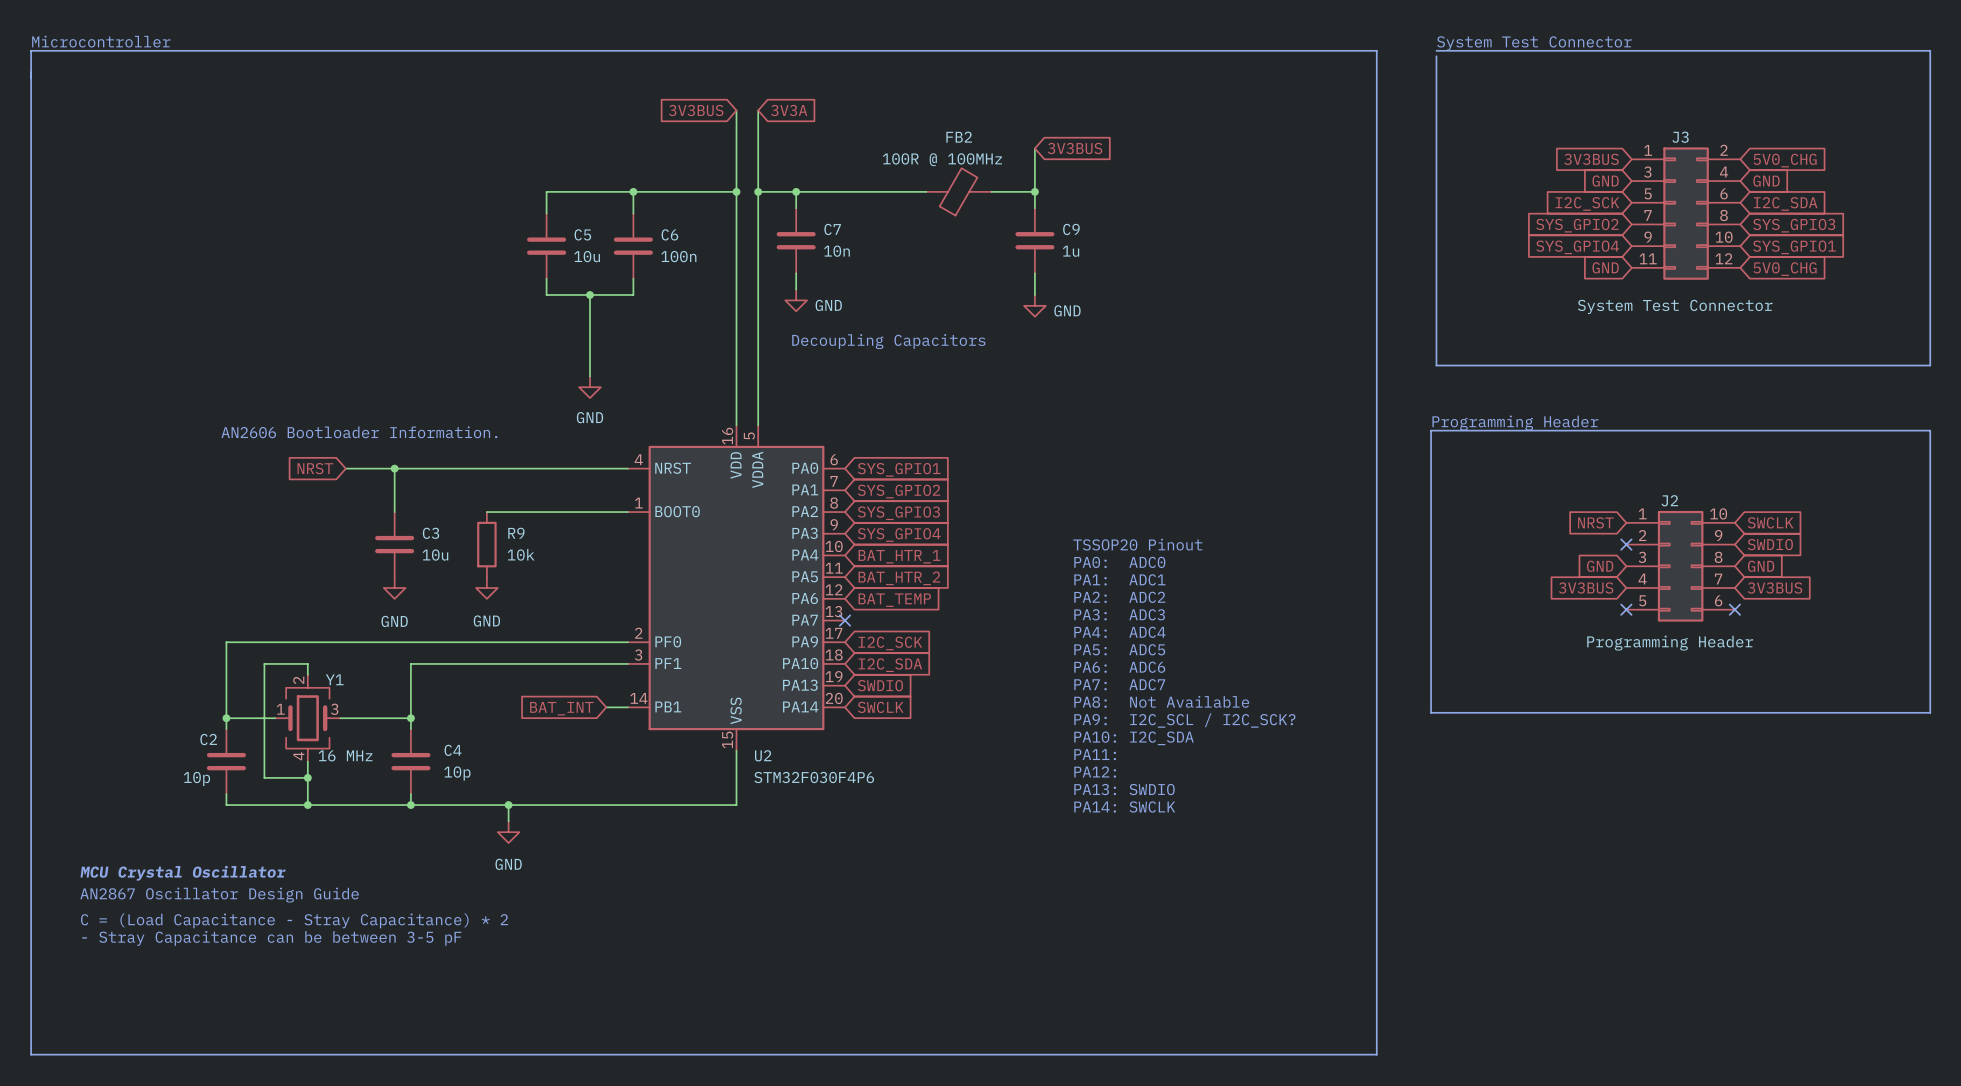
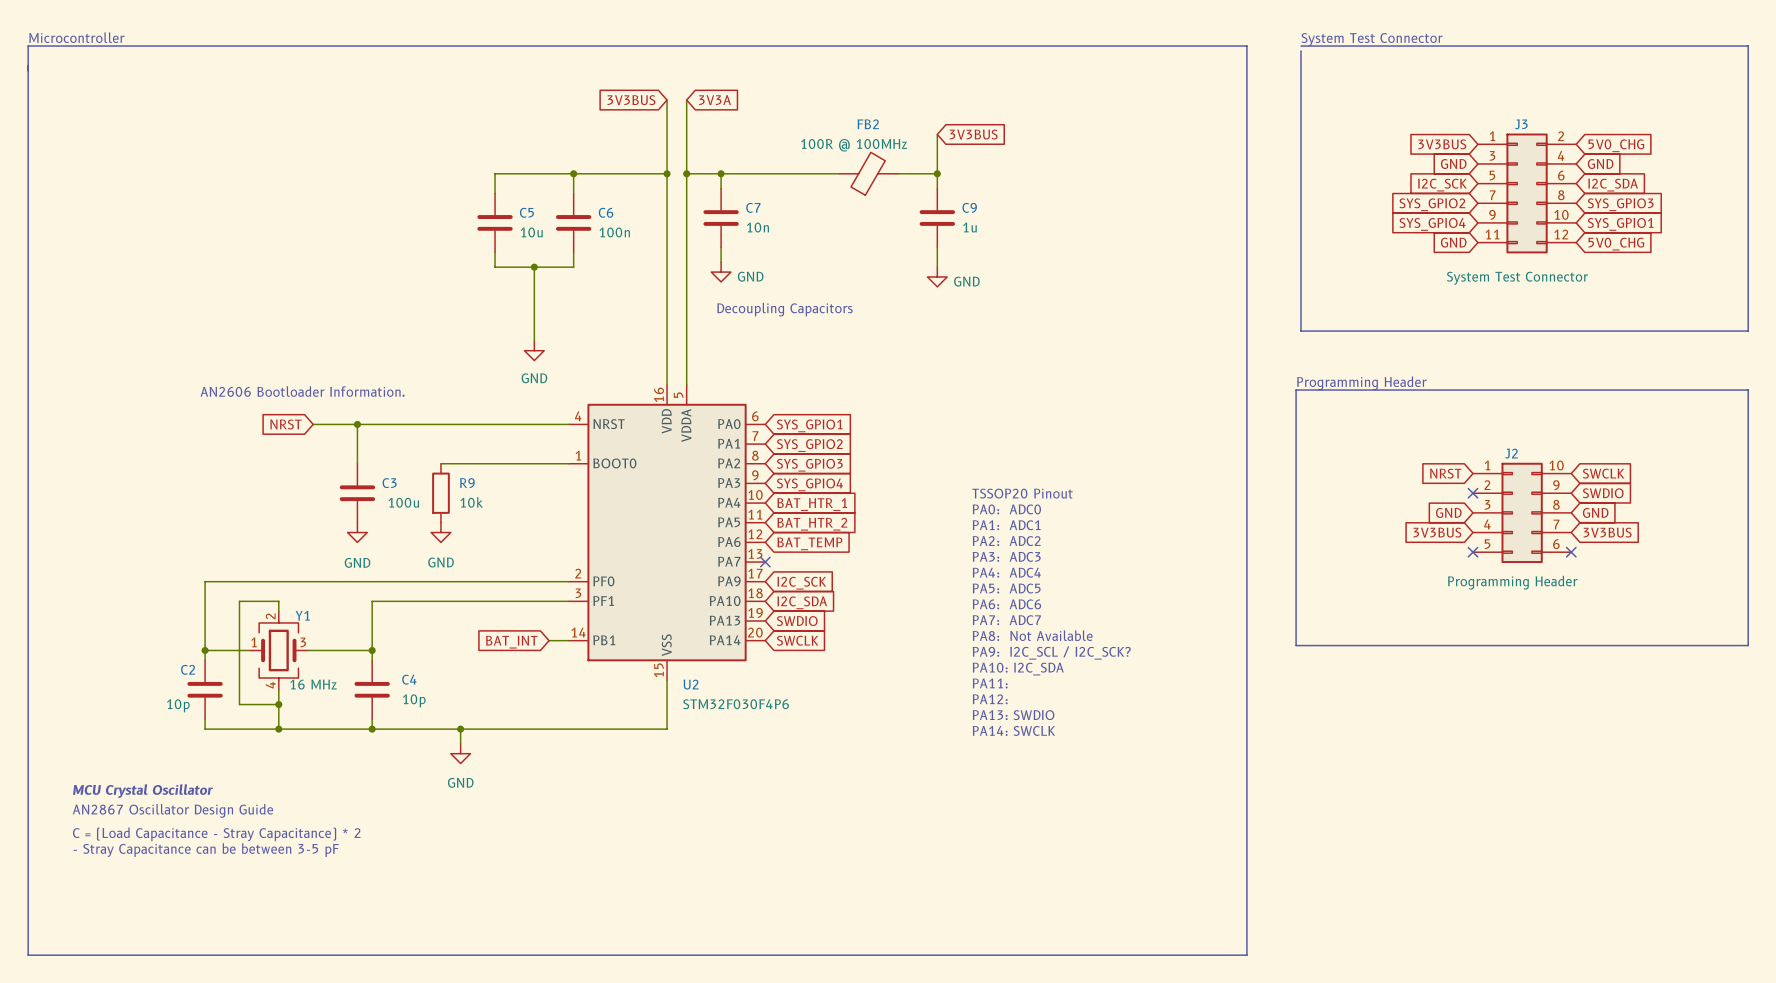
C3 value: 10u (435, 555) -> 100u (403, 502)

